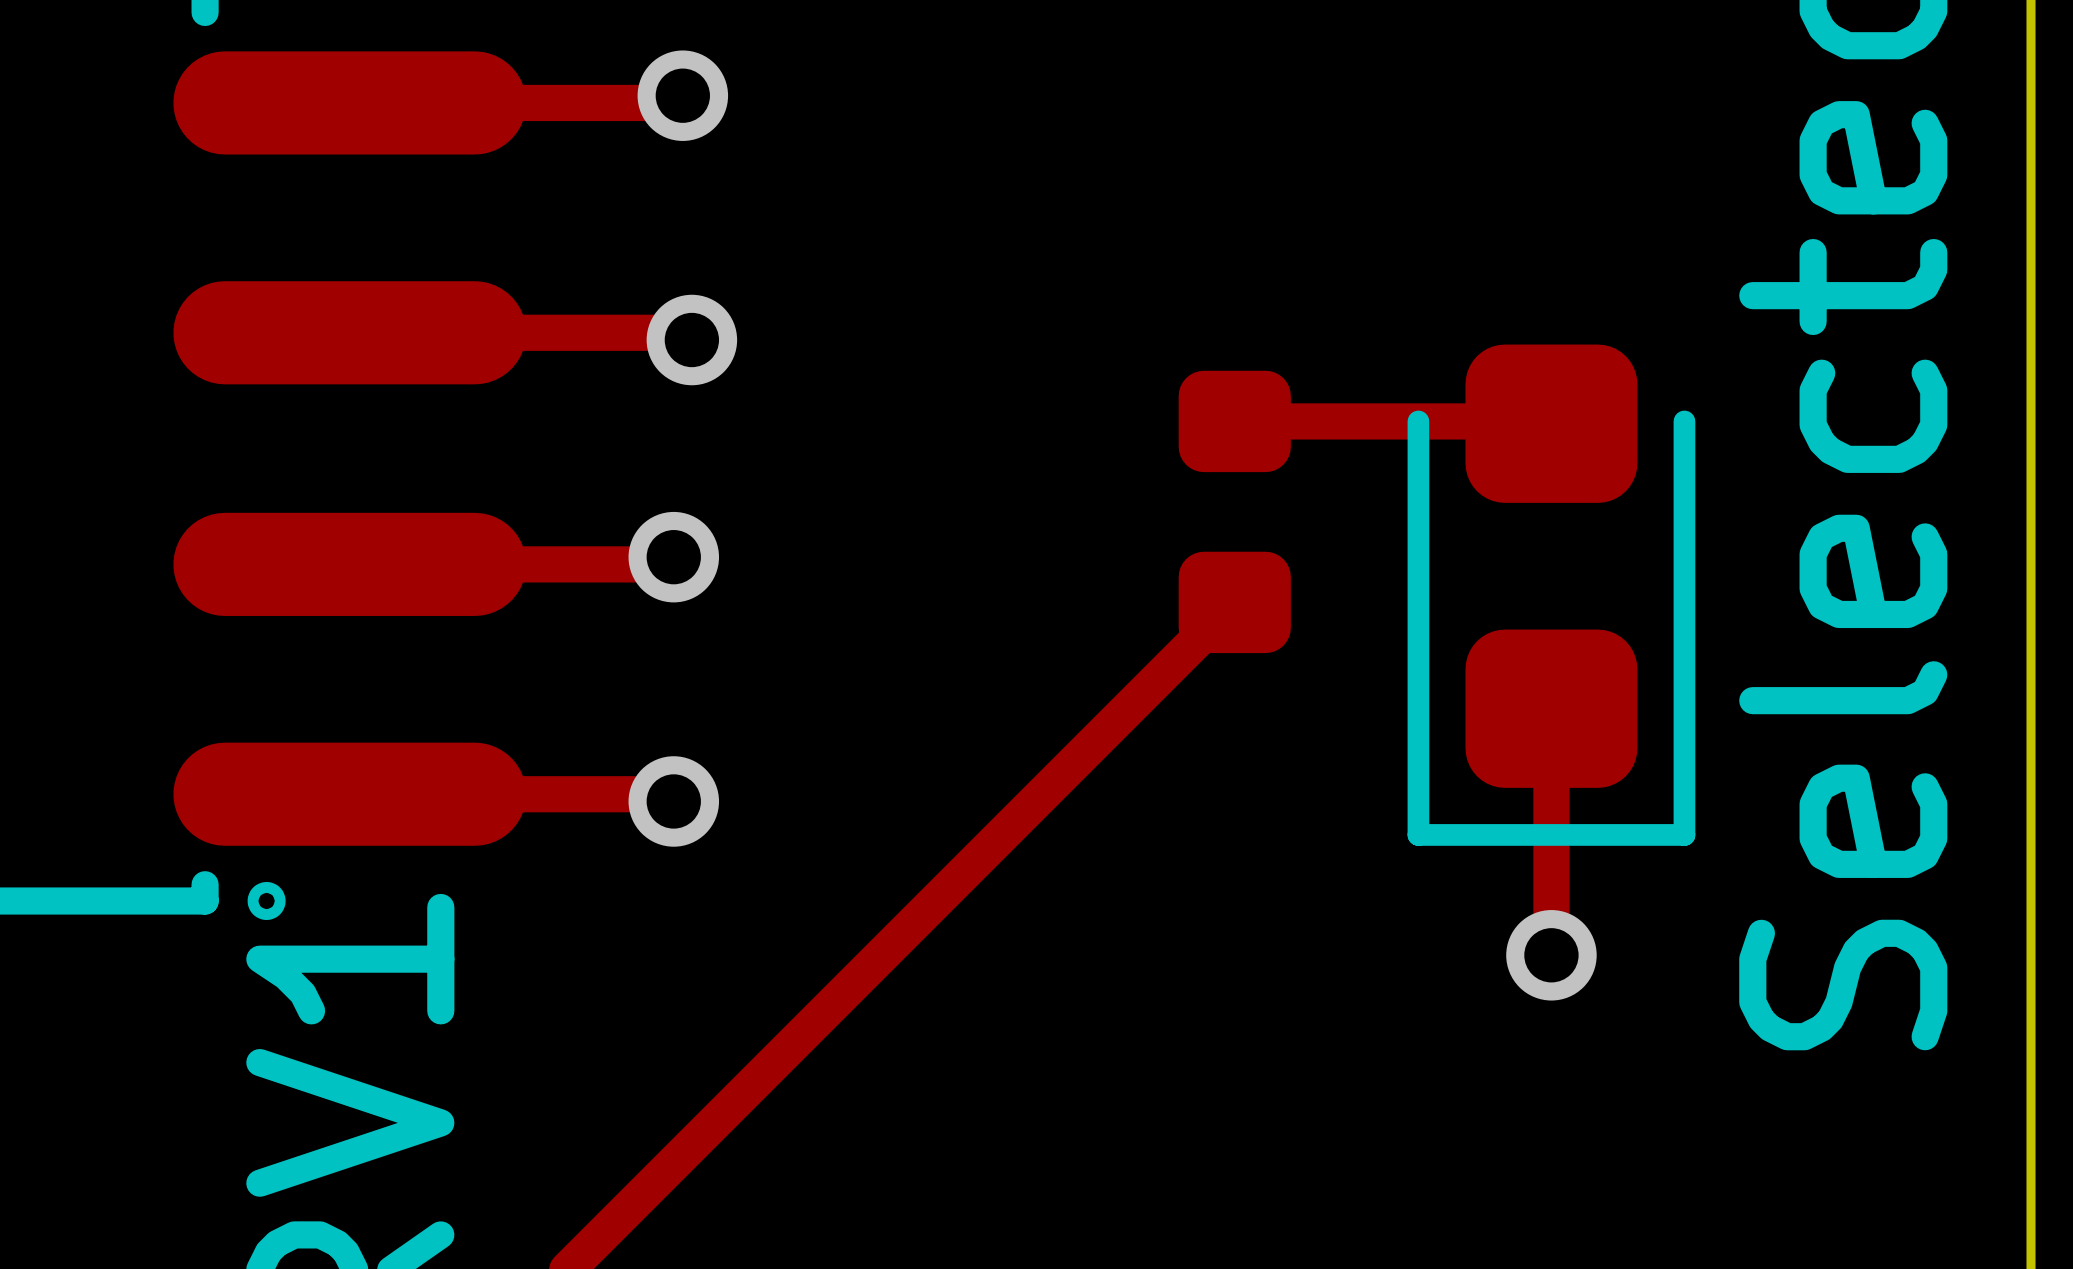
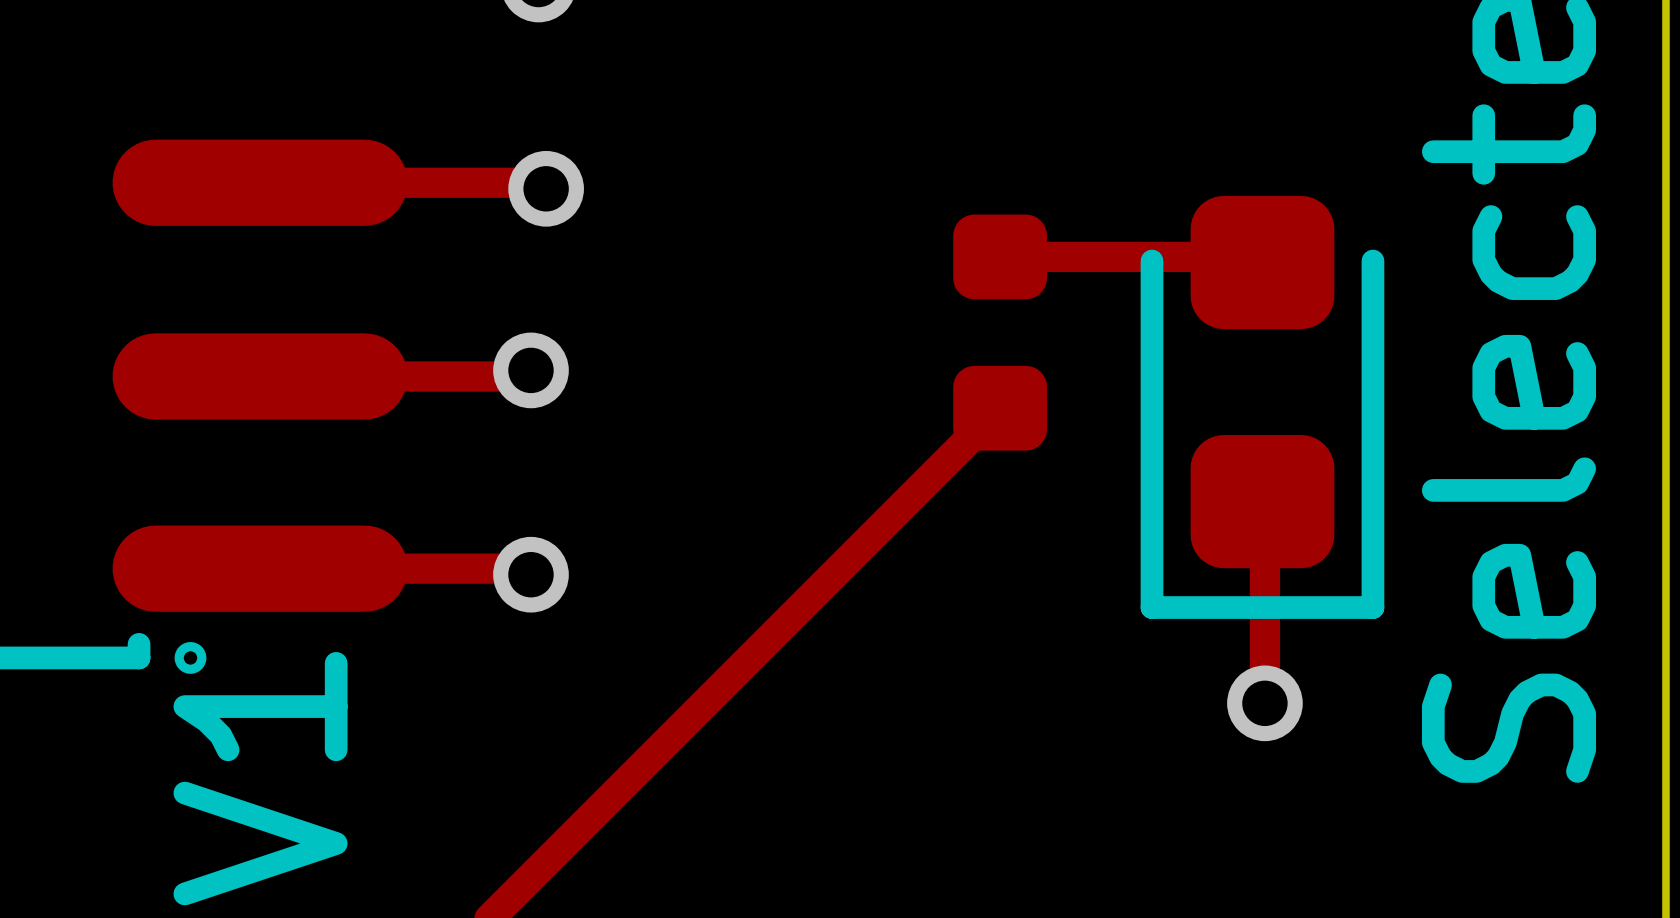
part footprint: [1407, 344, 1696, 846] -> [1140, 195, 1385, 619]

